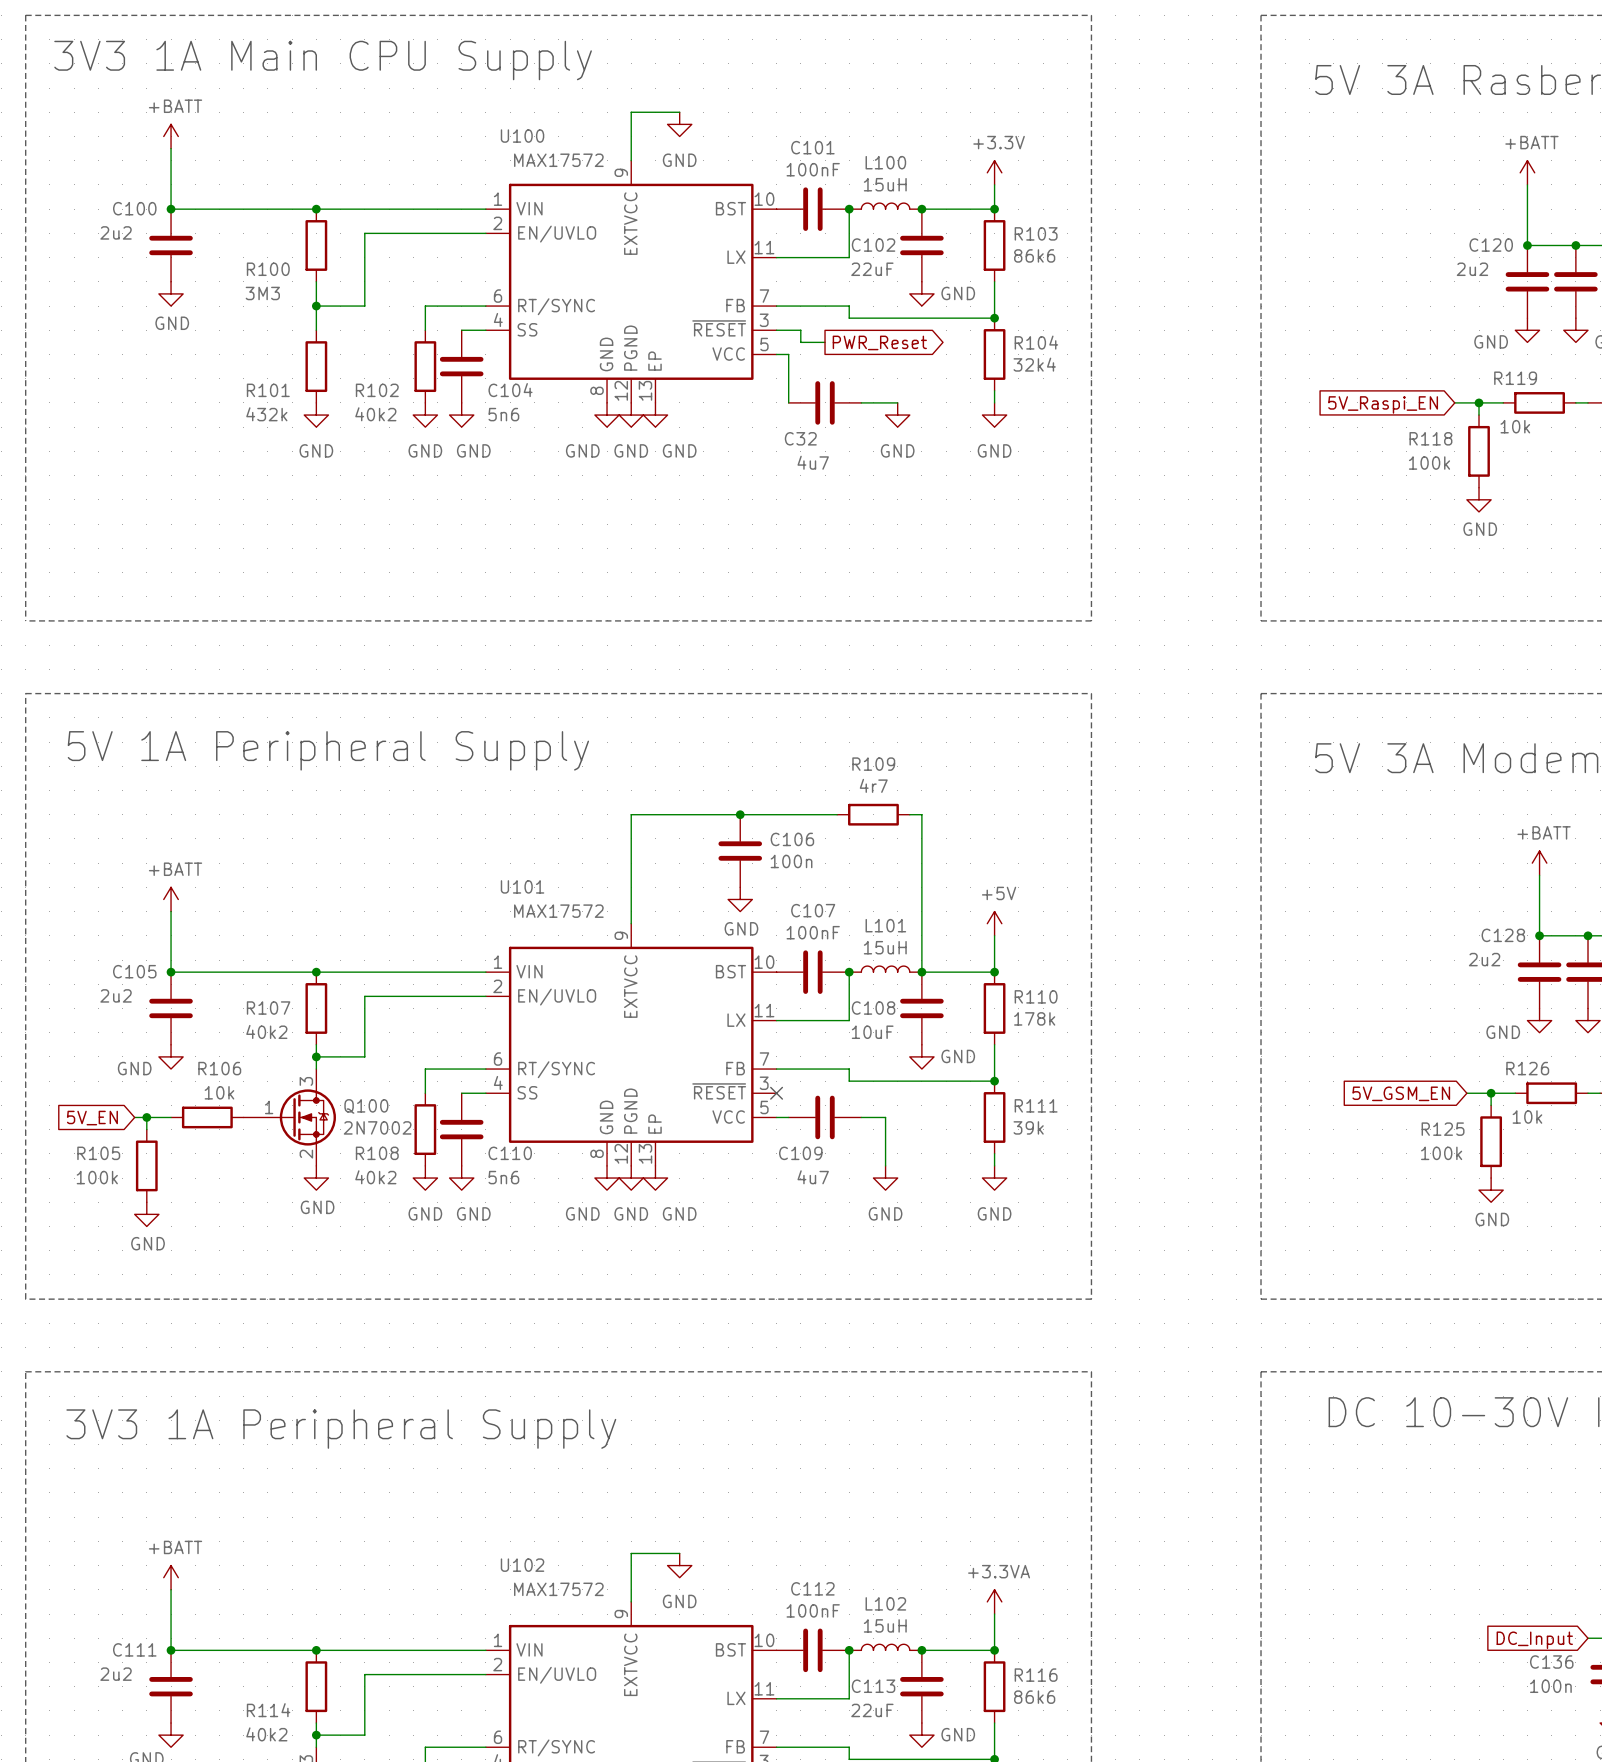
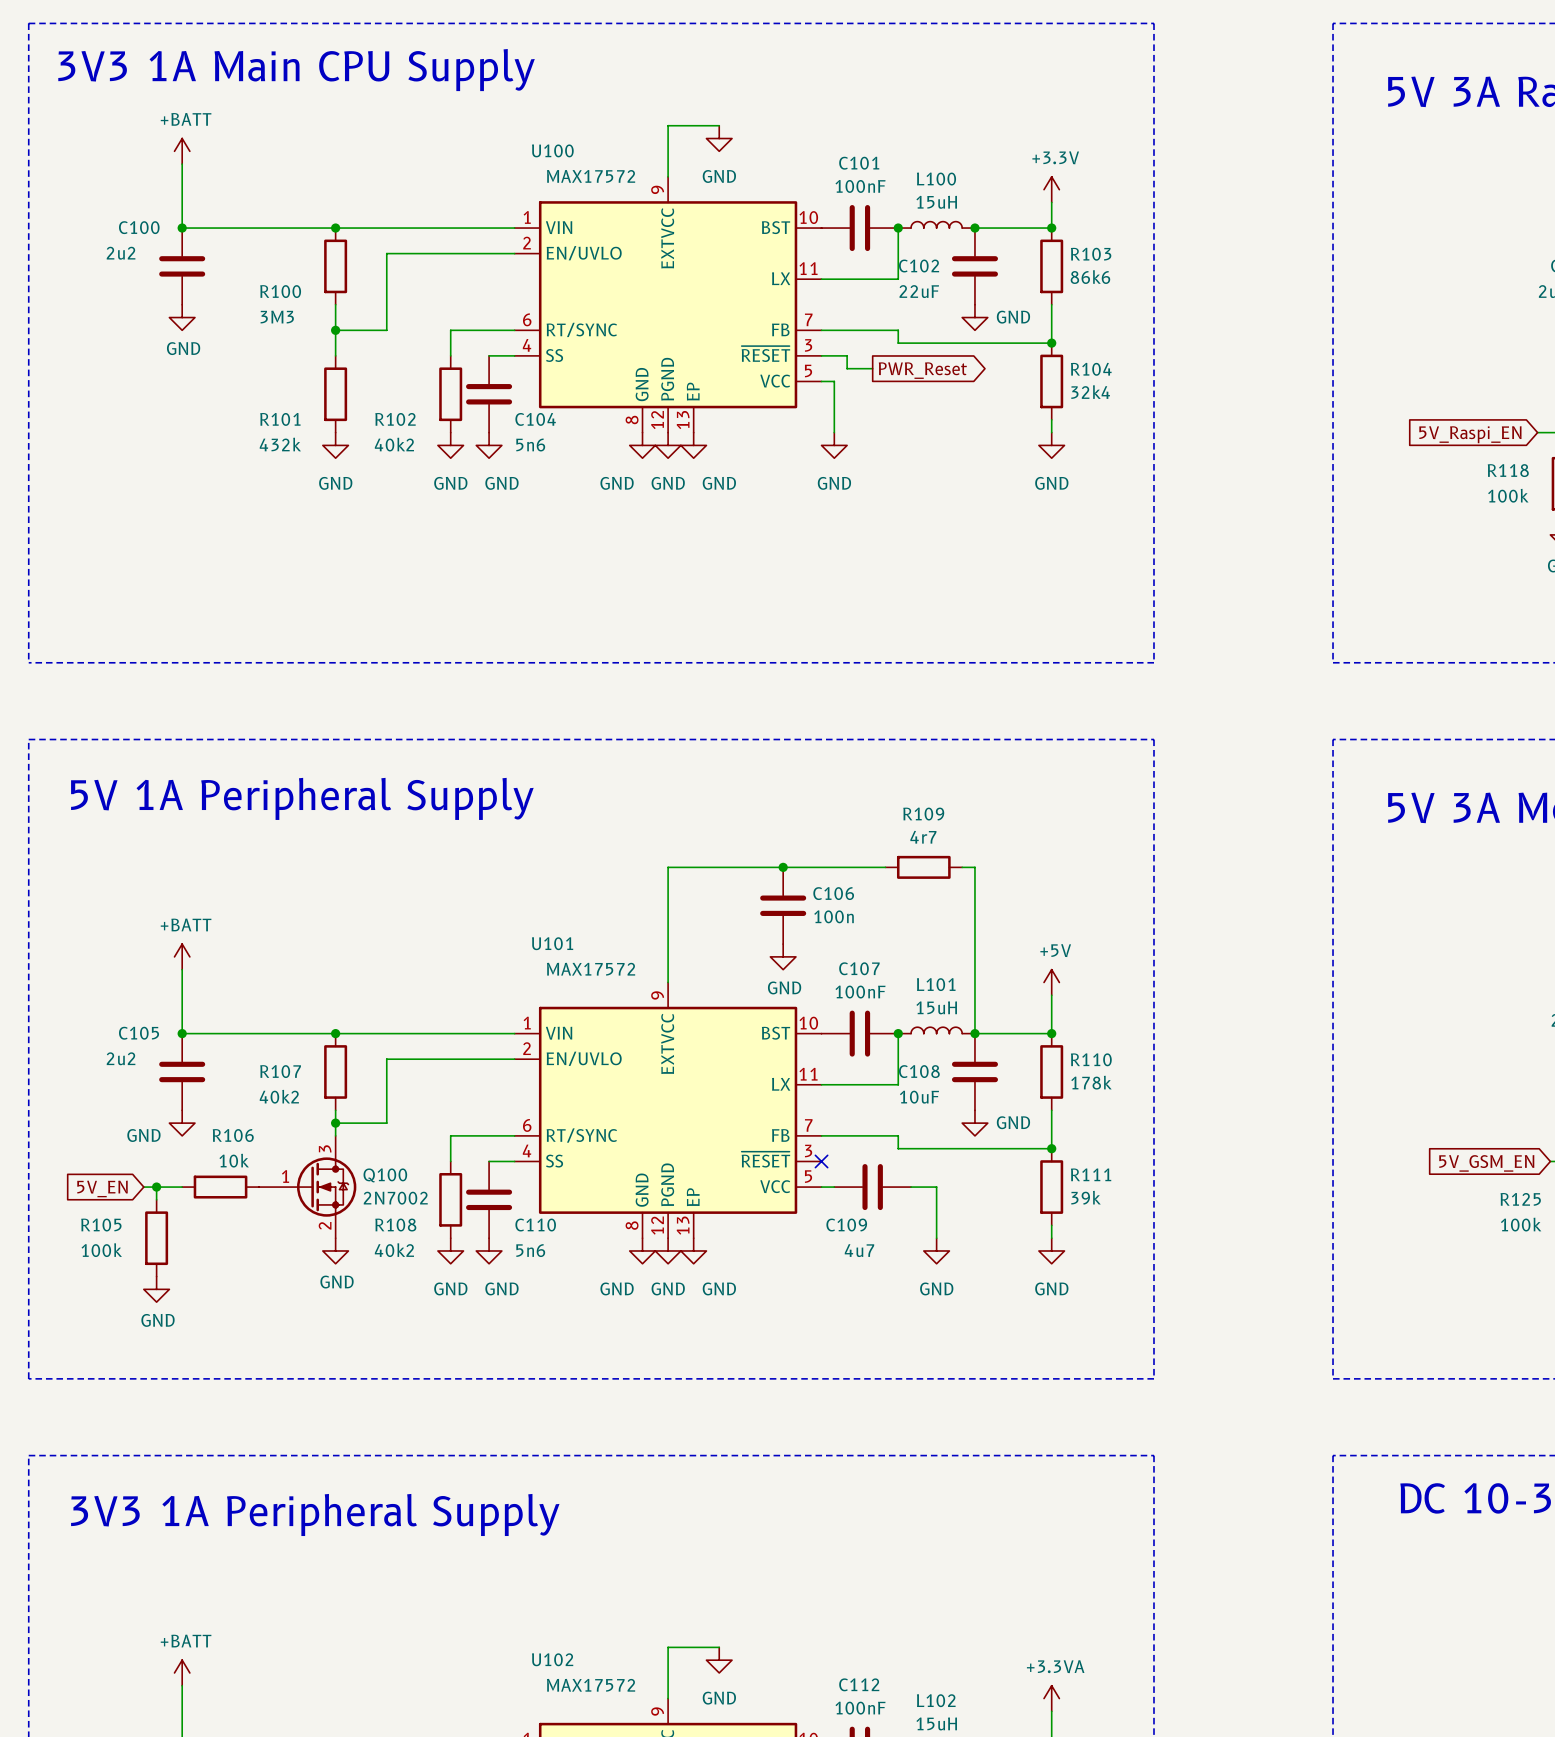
C32: 4u7 (825, 402) -> none
wire: (861, 402) (897, 402) -> none
power symbol position: GND (897, 415) -> GND (834, 445)

